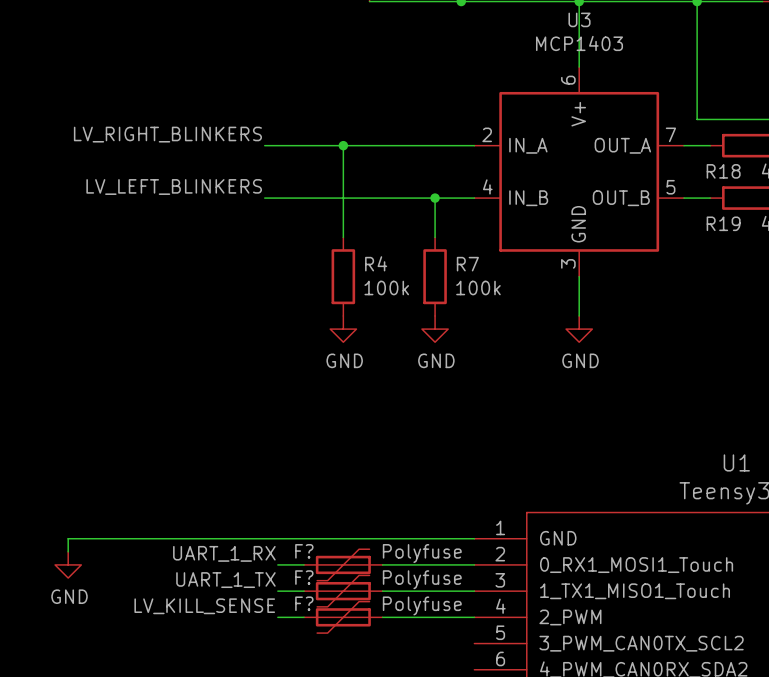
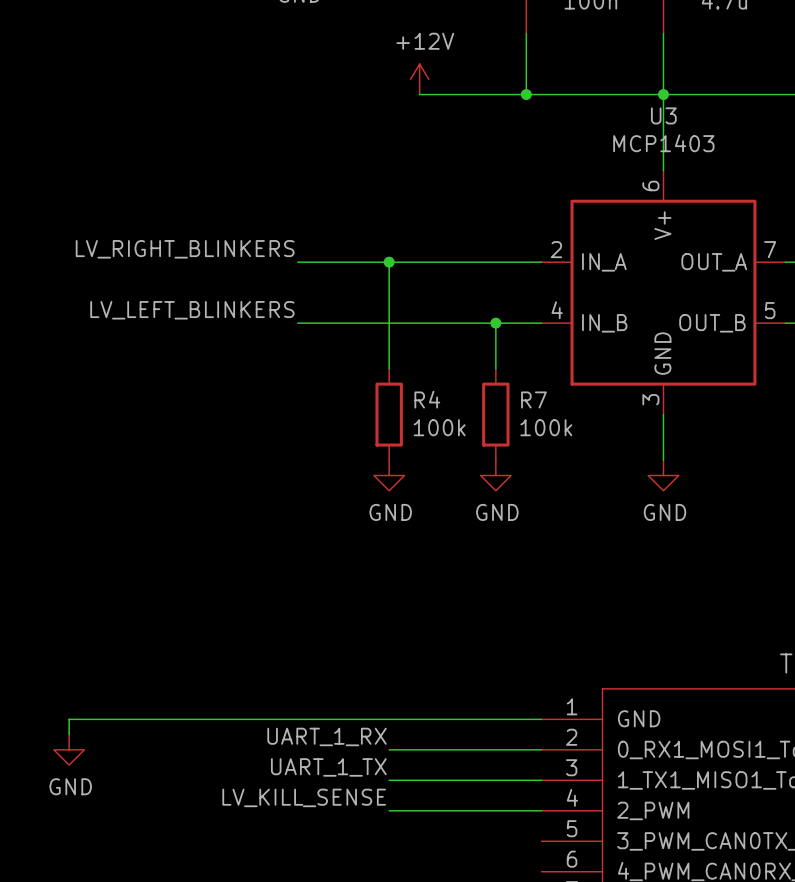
label position: UART_1_RX (224, 553) -> UART_1_RX (327, 736)
wire: (277, 564) (304, 564) -> none
F?: Polyfuse (343, 564) -> none
label position: UART_1_TX (225, 580) -> UART_1_TX (328, 767)
wire: (277, 591) (304, 591) -> none
F?: Polyfuse (343, 591) -> none
label position: LV_KILL_SENSE (204, 606) -> LV_KILL_SENSE (304, 797)
wire: (277, 617) (304, 617) -> none
F?: Polyfuse (343, 617) -> none

